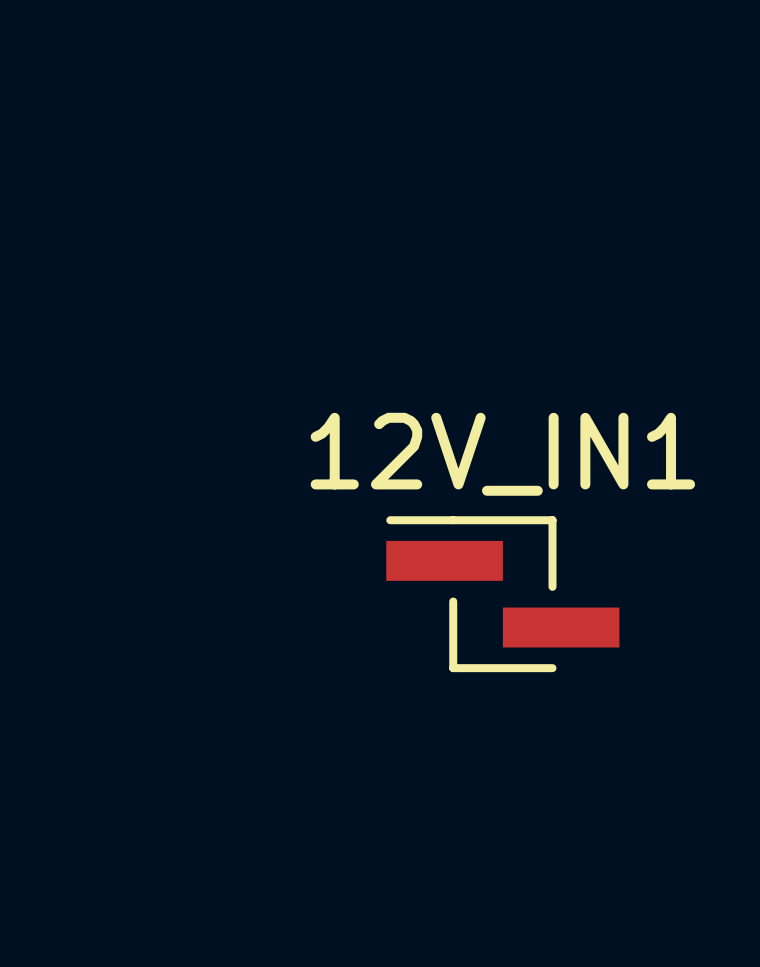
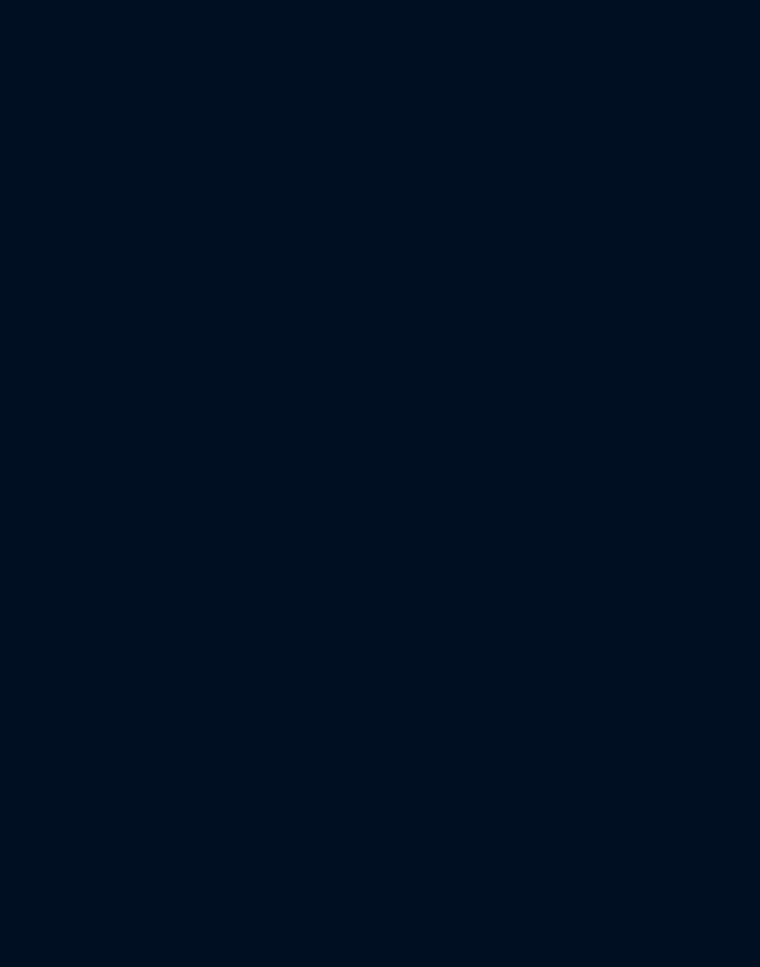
12V_IN1: (502, 594) -> none

